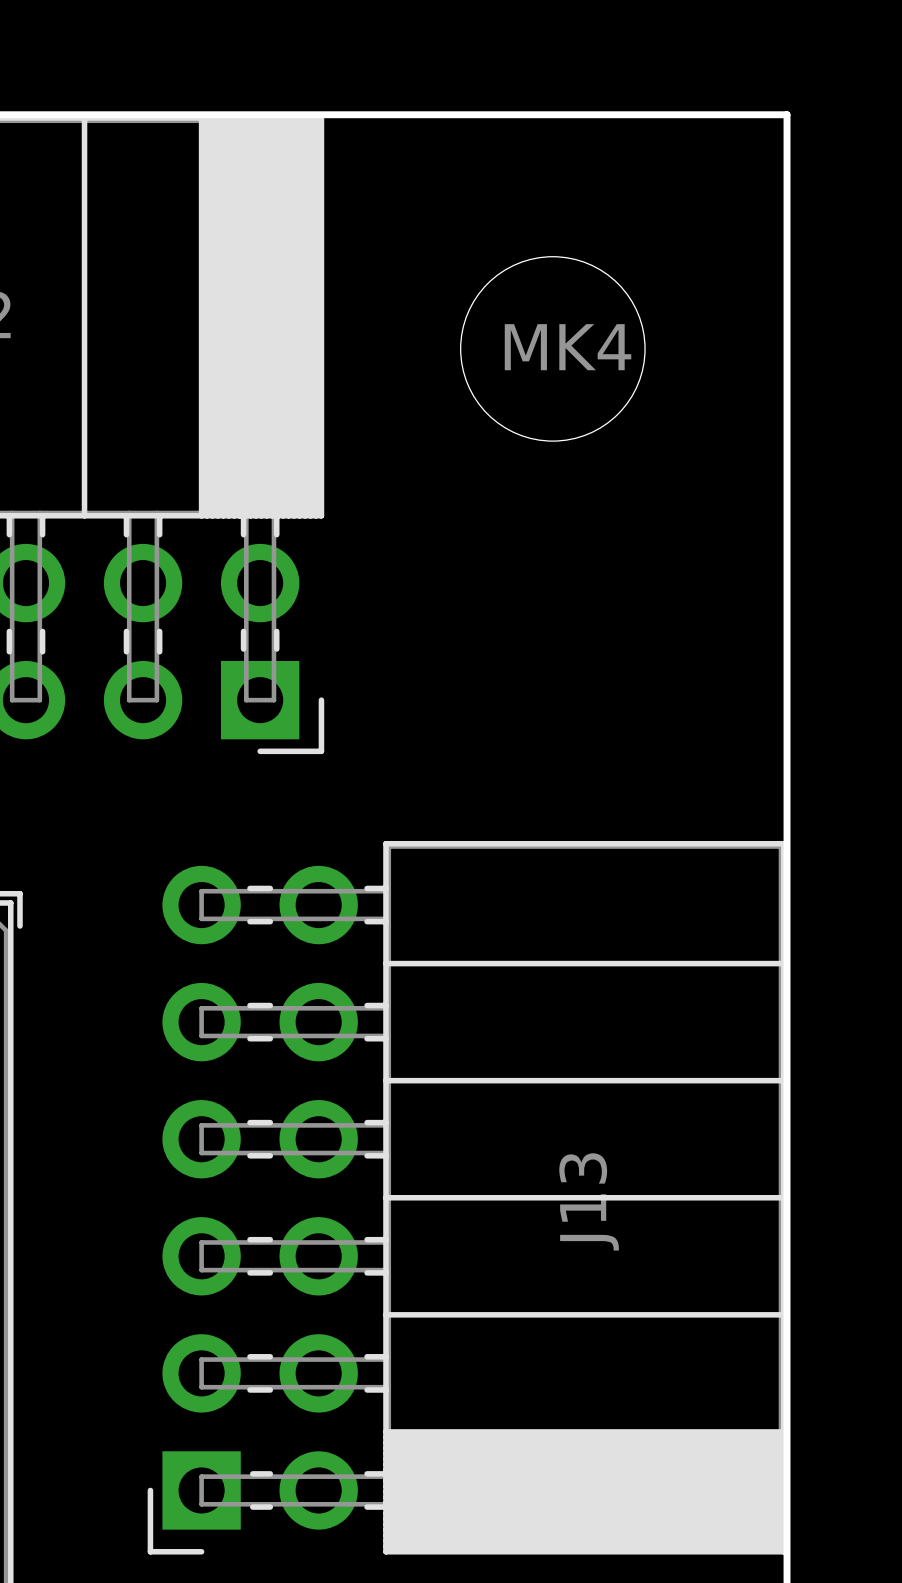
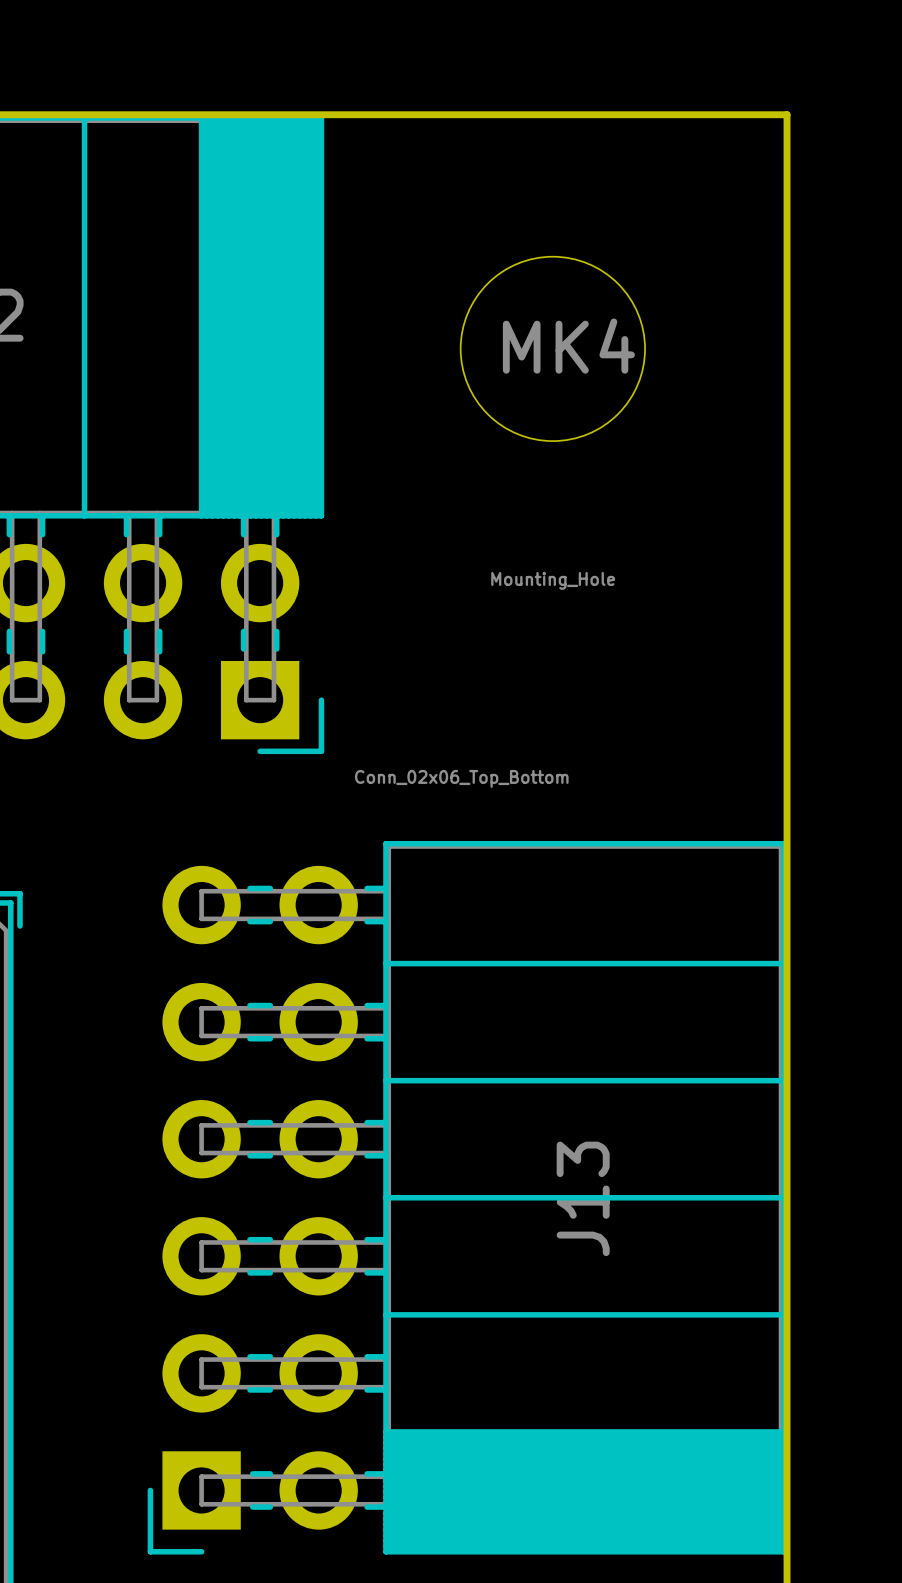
MK4 value: none -> Mounting_Hole (553, 580)
J13 value: none -> Conn_02x06_Top_Bottom (461, 778)

